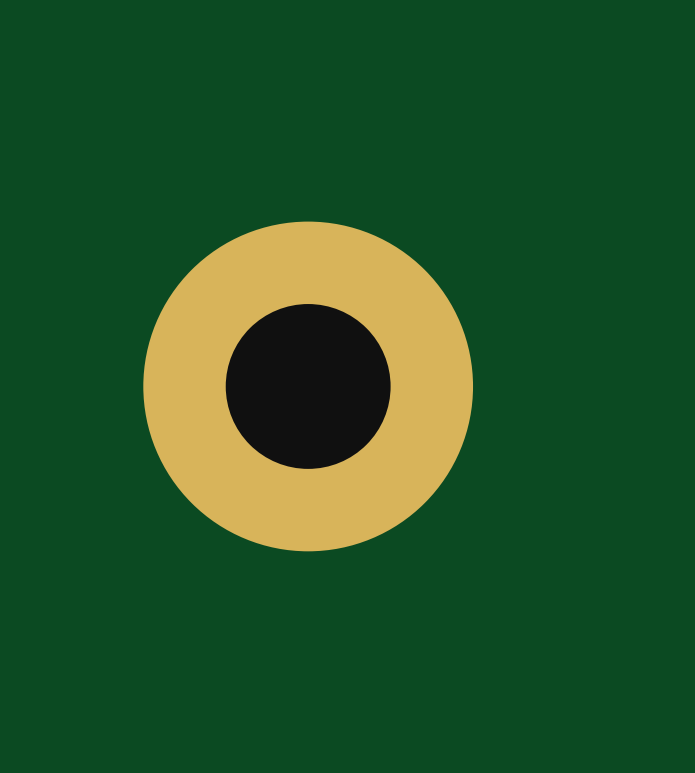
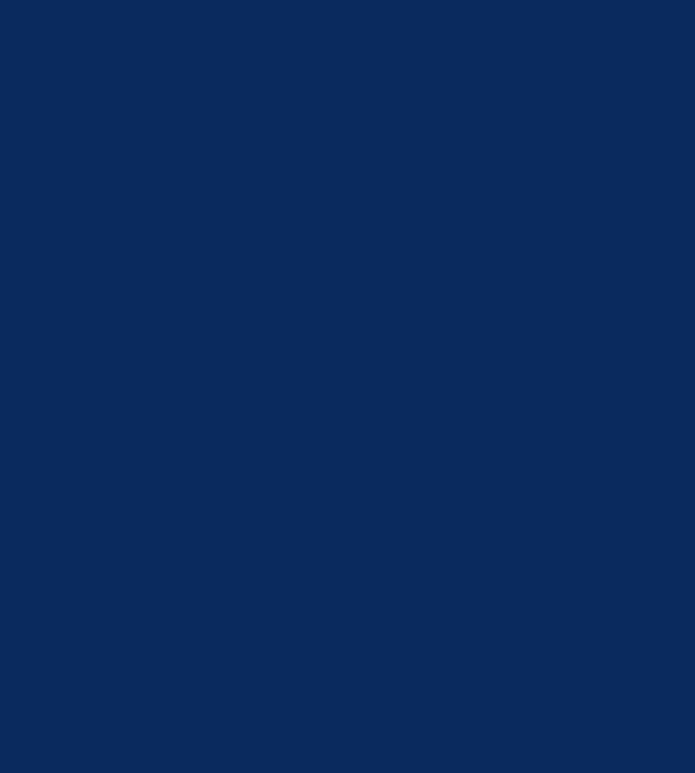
part: (308, 386) -> none

